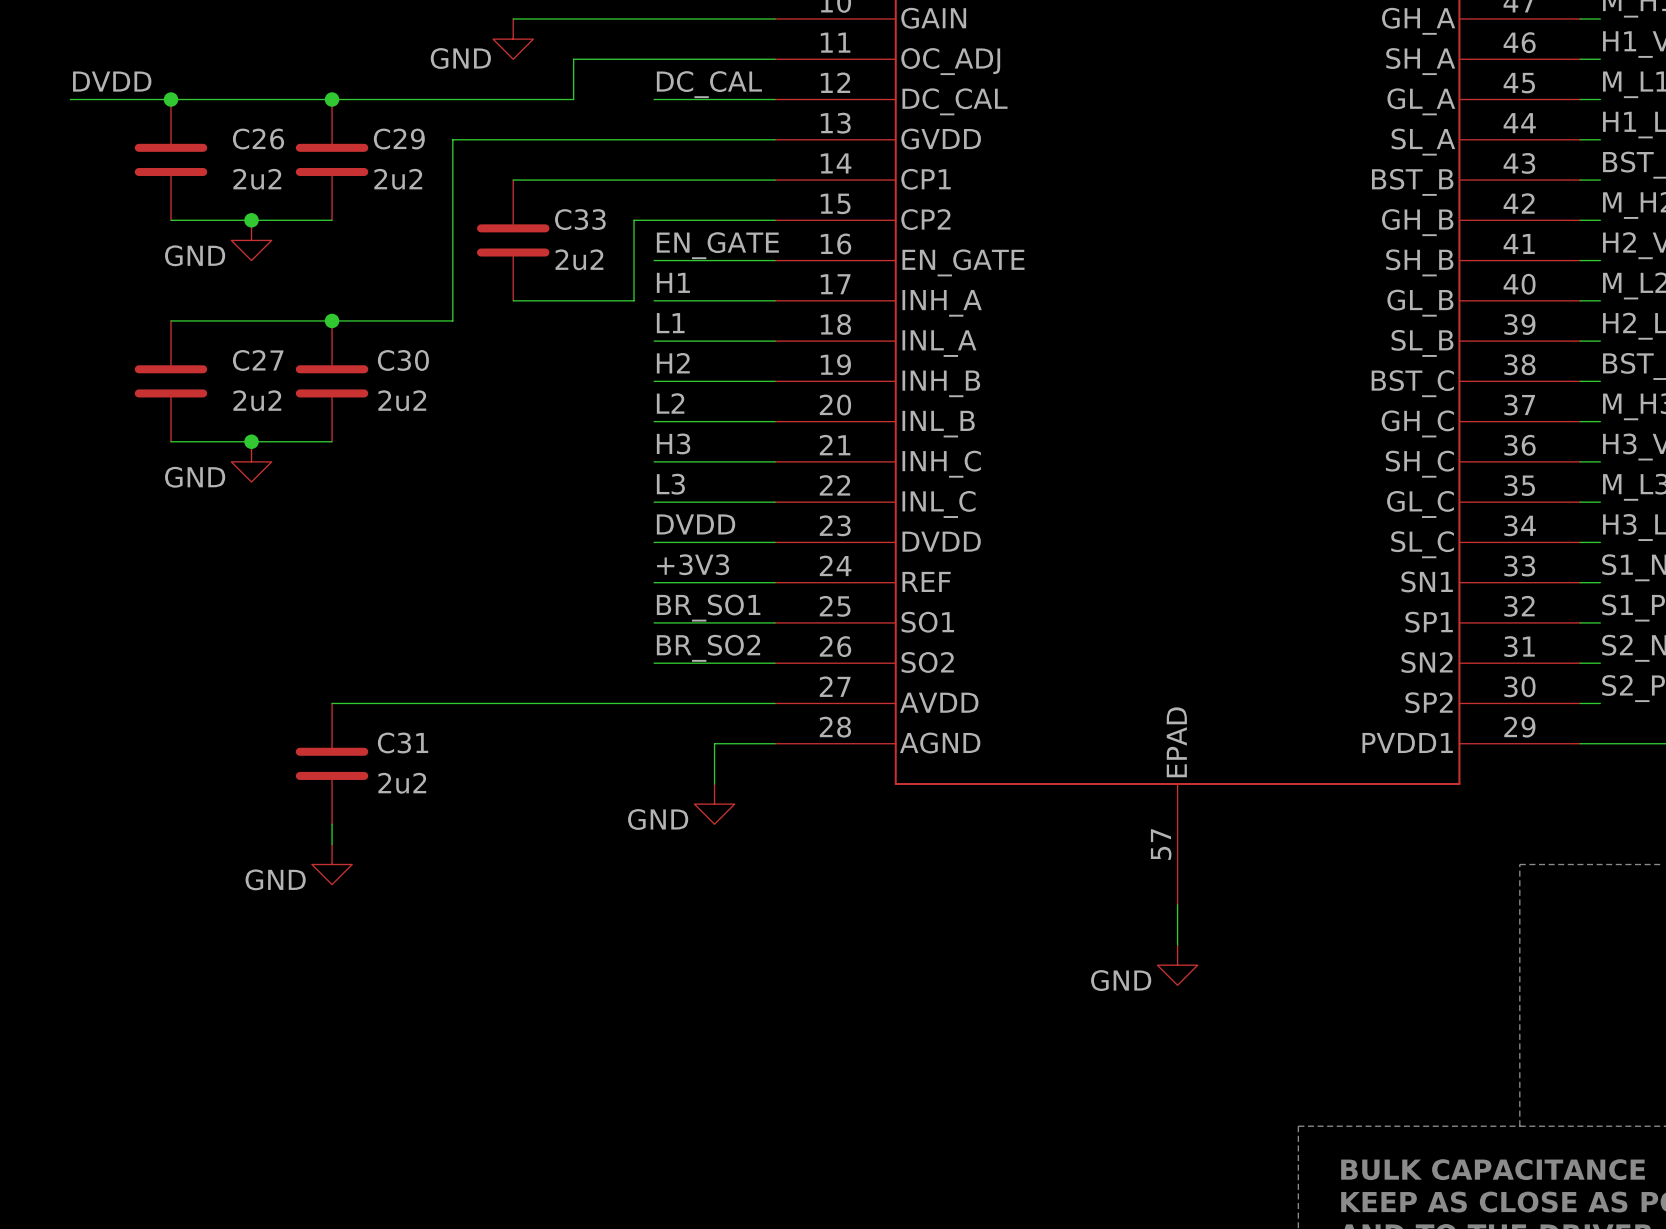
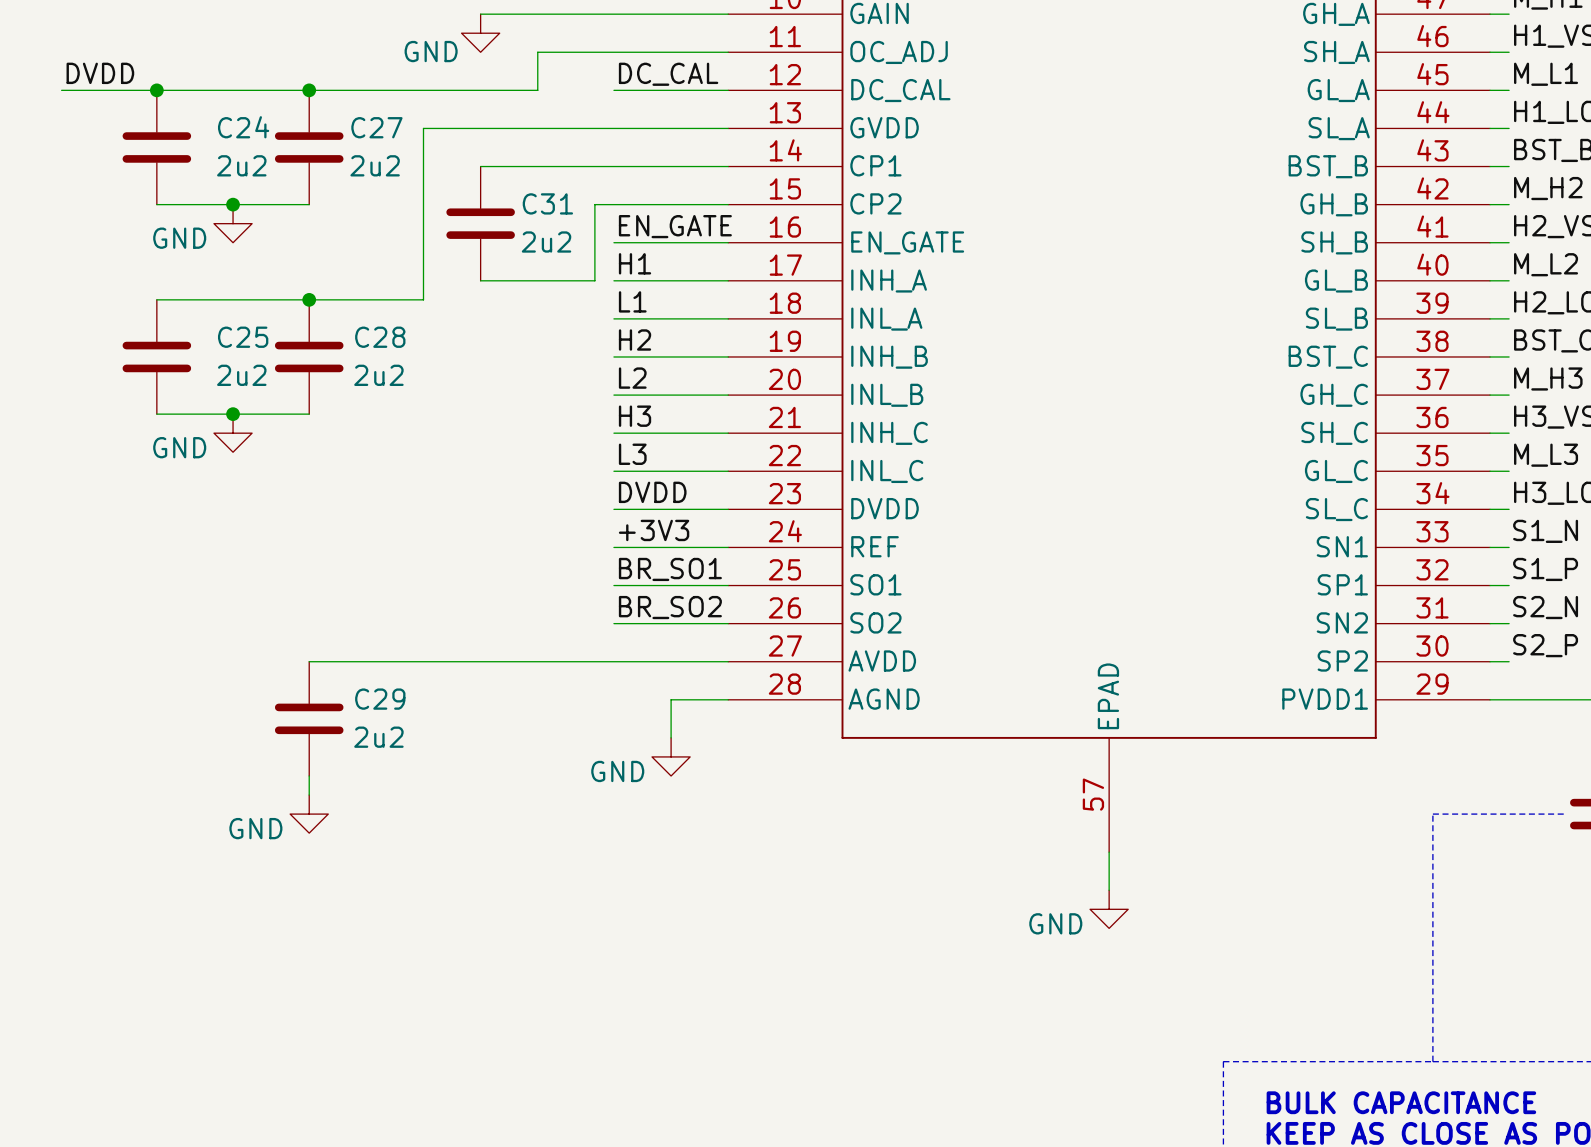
C26 name: C26 (258, 139) -> C24 (243, 127)
C29 name: C29 (399, 139) -> C27 (376, 127)
C33 name: C33 (580, 219) -> C31 (547, 203)
C27 name: C27 (258, 360) -> C25 (243, 337)
C30 name: C30 (403, 360) -> C28 (380, 337)
C31 name: C31 (403, 742) -> C29 (380, 699)

